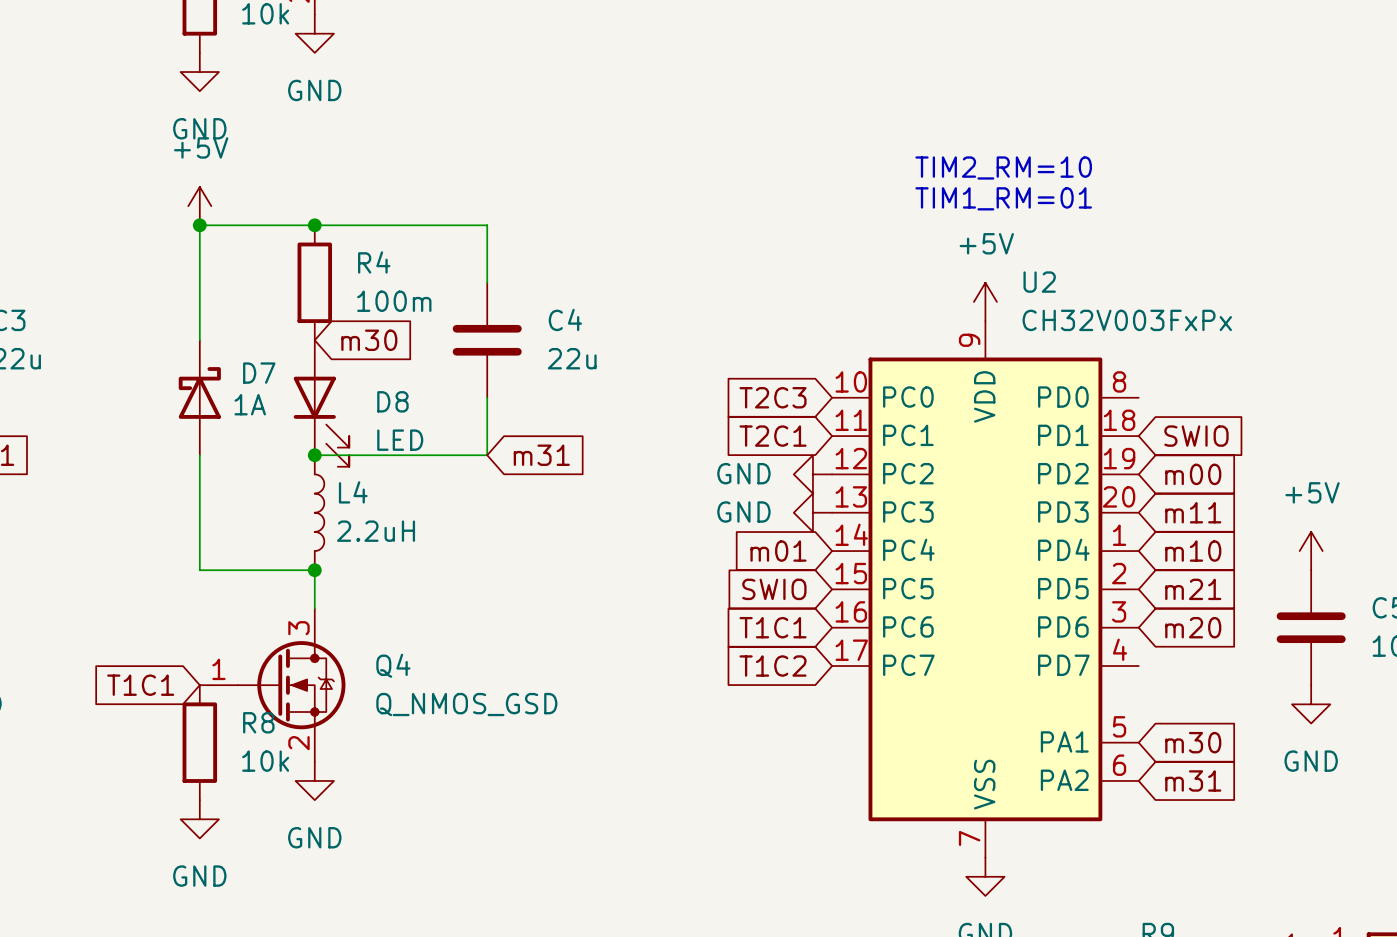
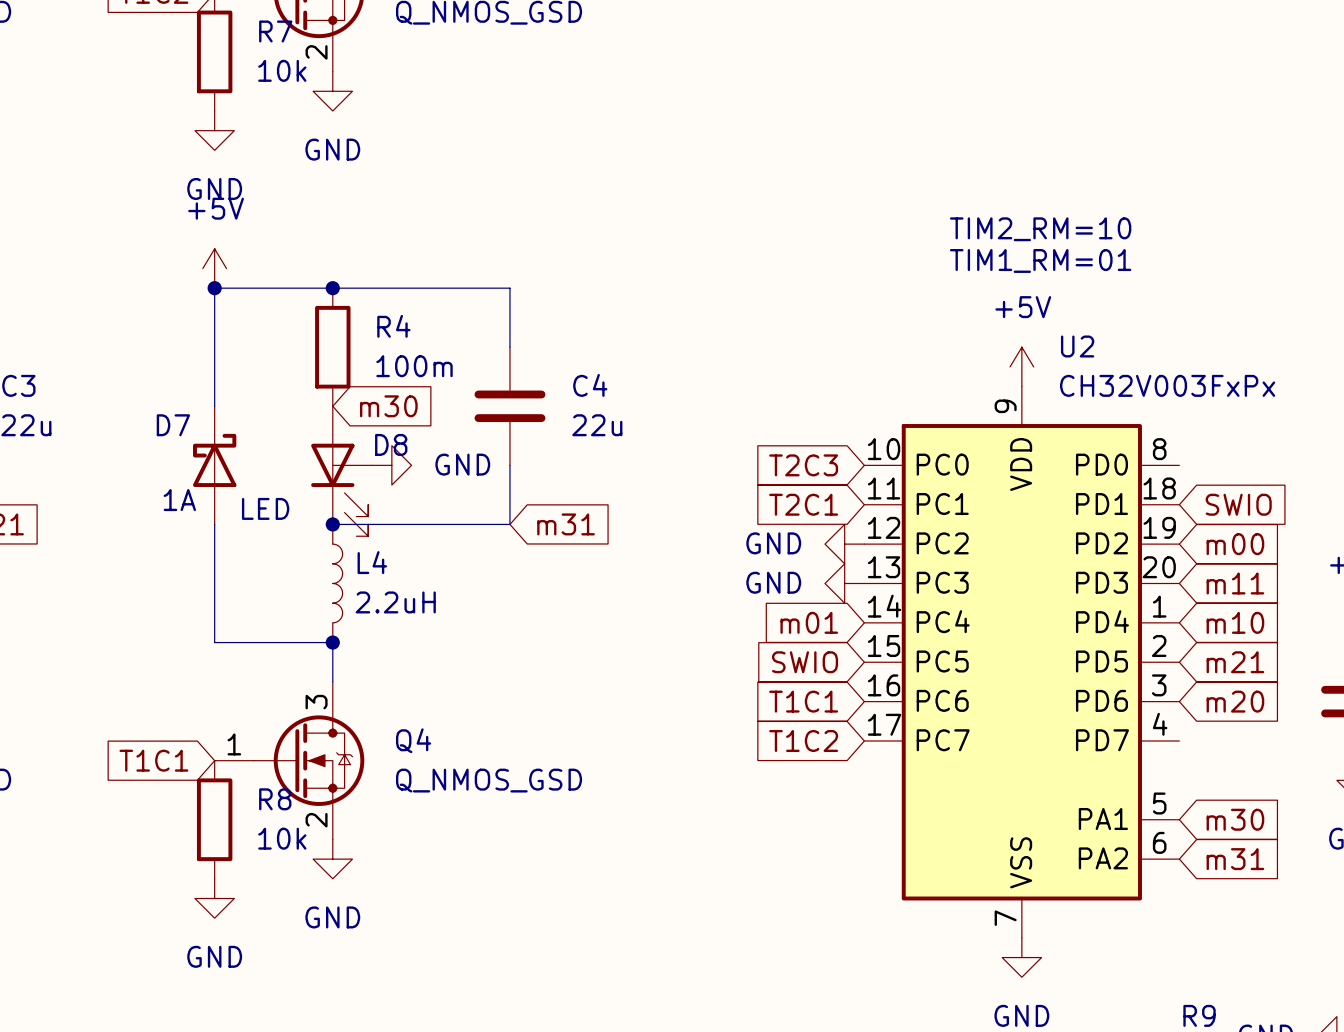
D8 symbol: [293, 340, 350, 467] -> [311, 406, 373, 537]
D7 name position: D7 (259, 373) -> D7 (173, 425)
power symbol: none -> GND (391, 465)
D8 name position: D8 (392, 401) -> D8 (391, 444)
D7 value position: 1A (250, 404) -> 1A (179, 500)
D8 value position: LED (400, 440) -> LED (265, 508)

